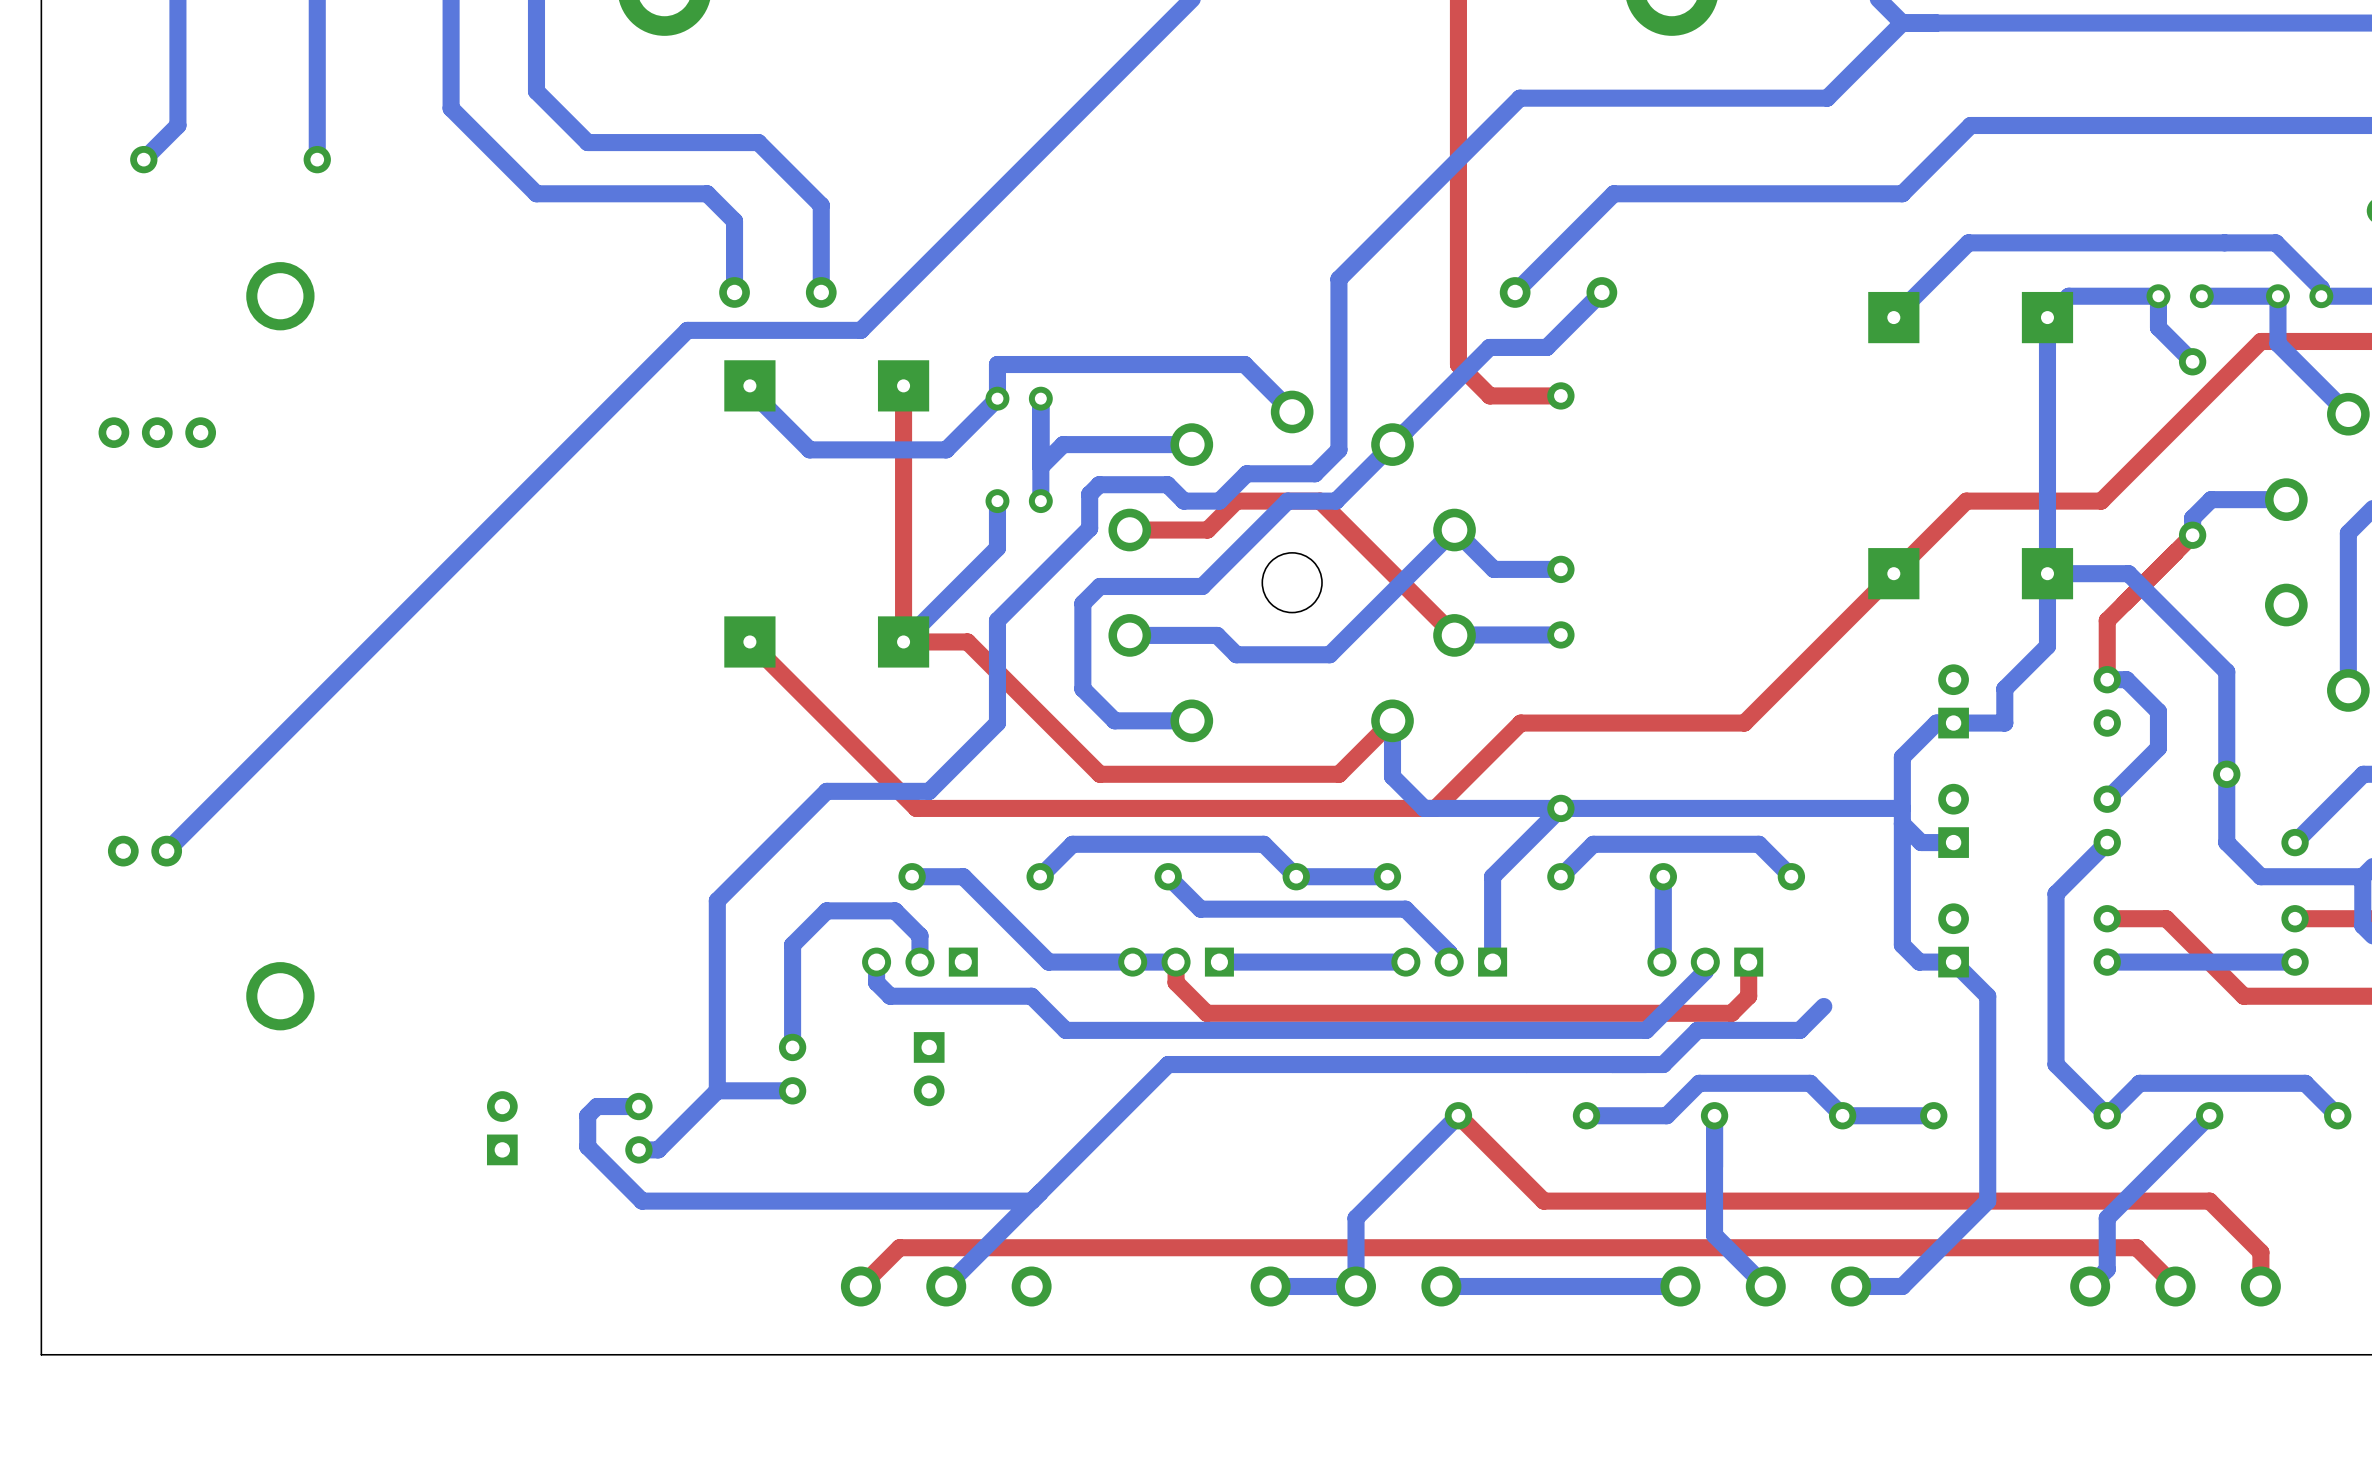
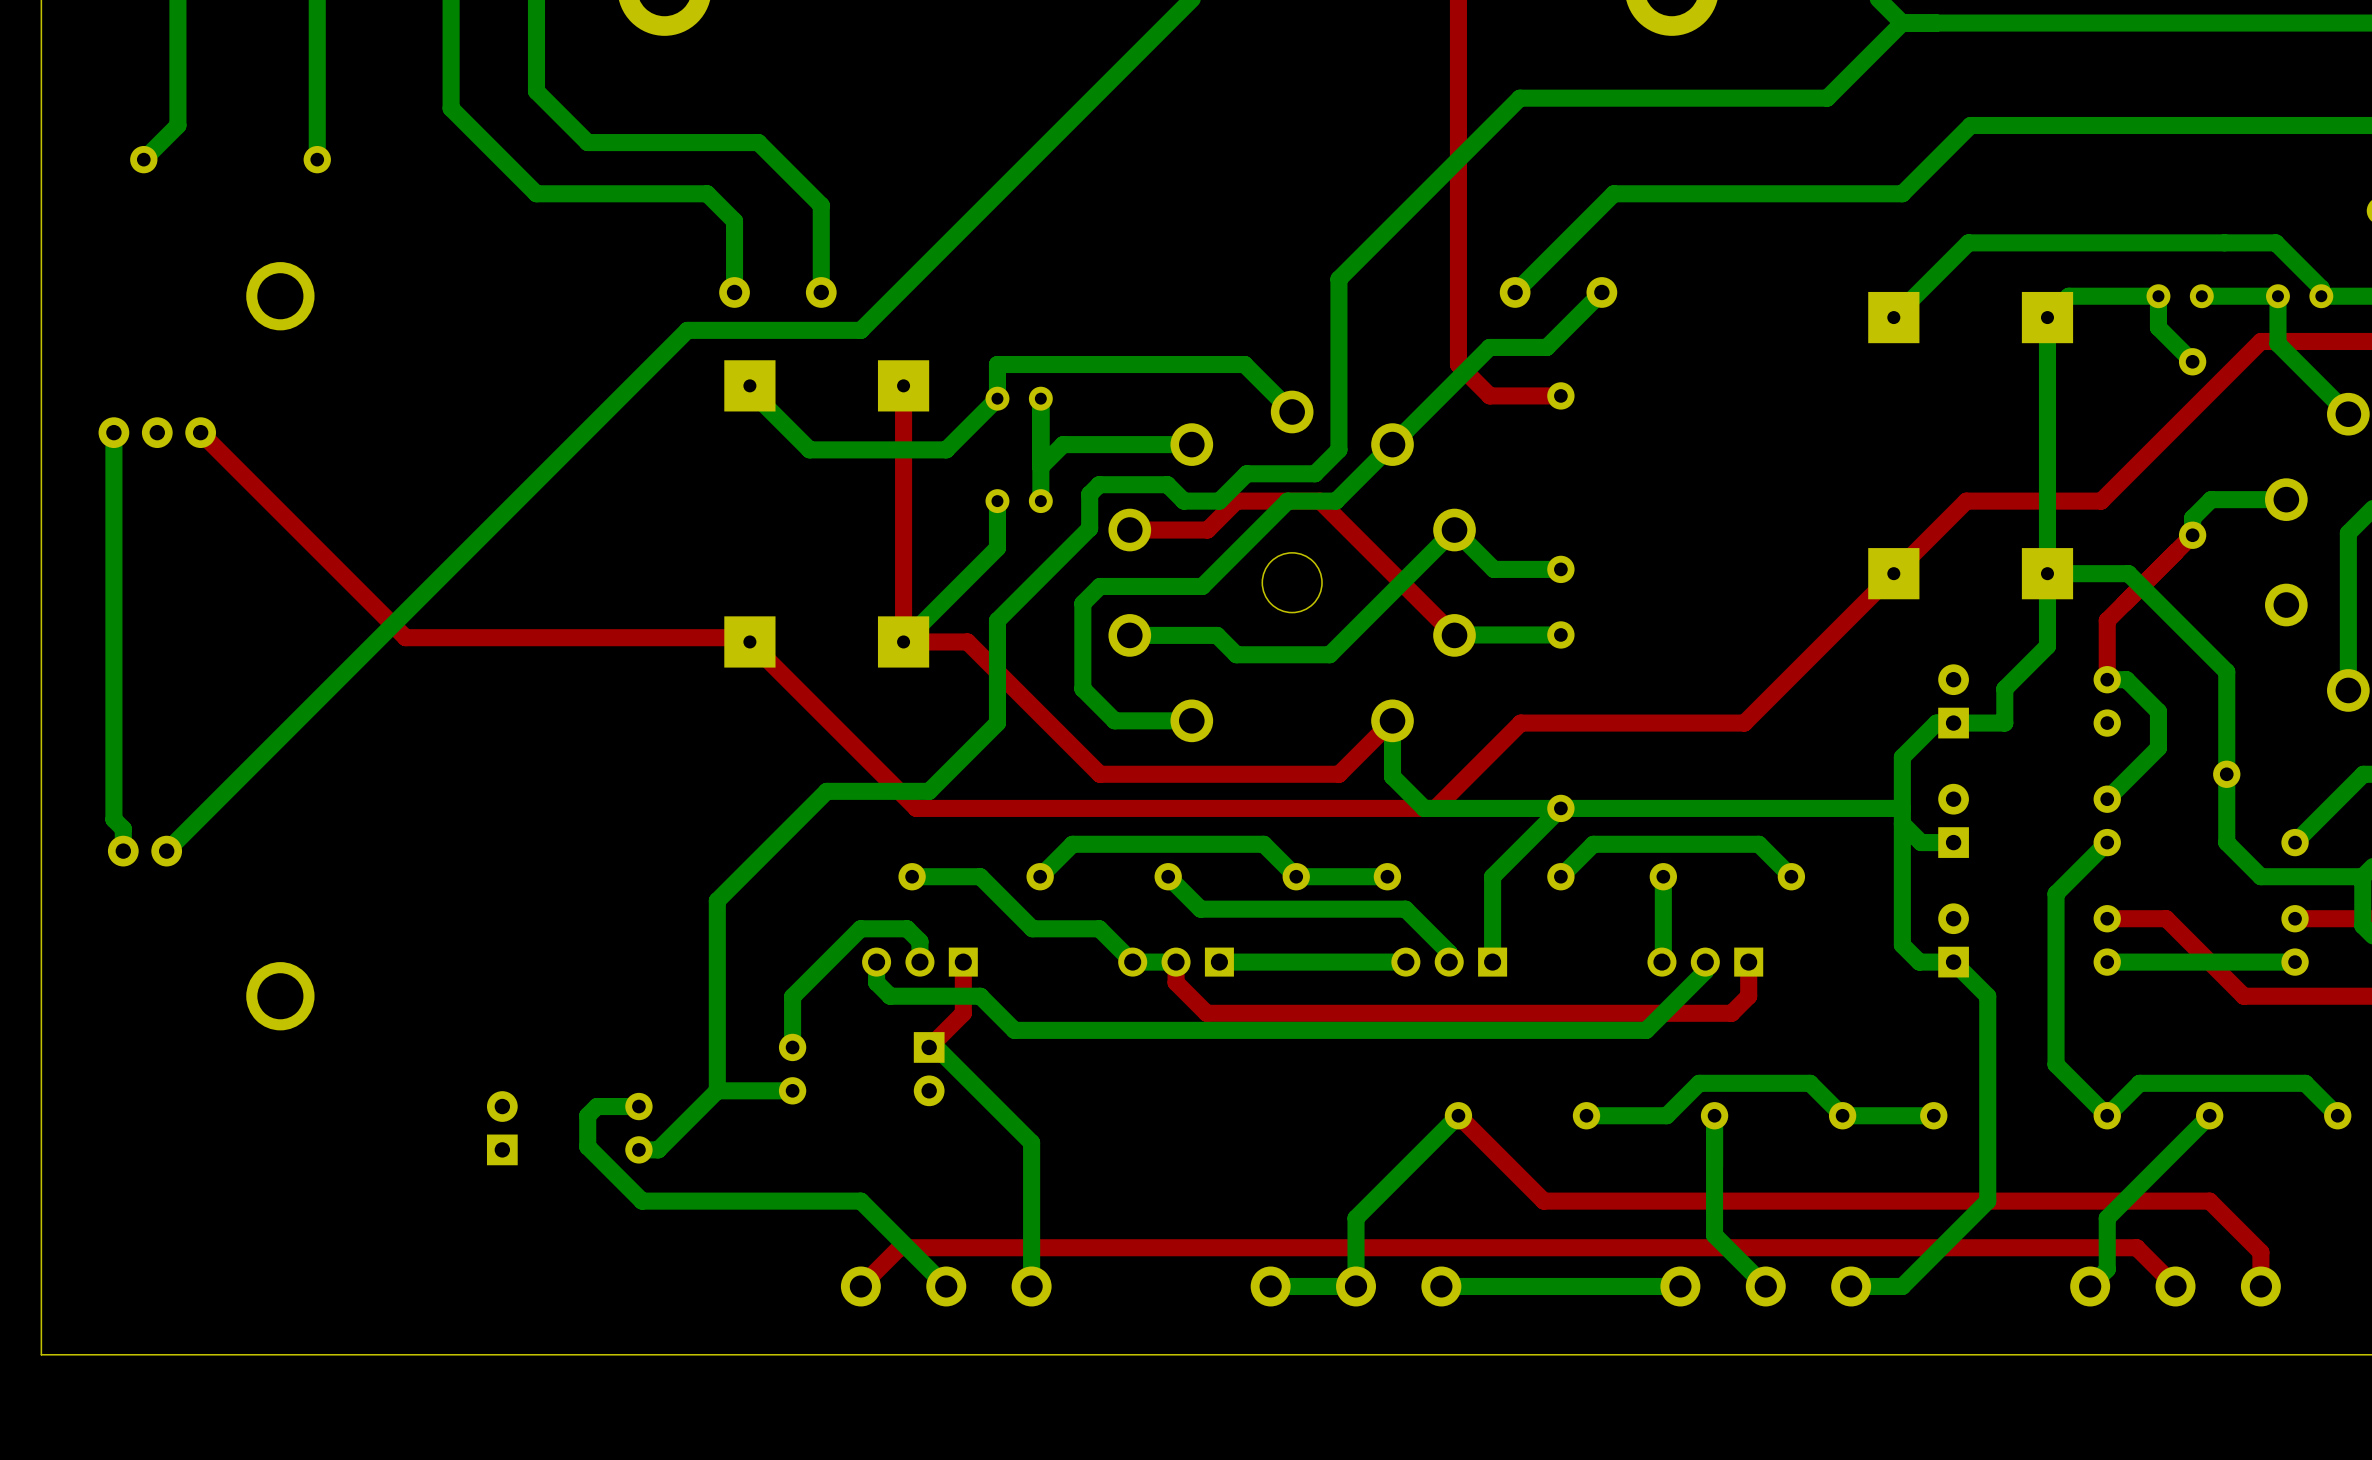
bottom track: none -> (113, 432) (113, 819) (123, 828) (123, 851)
top track: none -> (200, 432) (405, 637) (745, 637) (749, 641)
bottom track: (963, 876) (1048, 962) (1132, 962) -> (963, 876) (980, 876) (1032, 928) (1099, 928) (1132, 962)
bottom track: (919, 941) (919, 935) (895, 910) (826, 910) (792, 945) (792, 996) -> (919, 941) (907, 928) (860, 928) (792, 996)
top track: none -> (963, 962) (963, 1013) (929, 1047)
bottom track: (980, 996) (1031, 996) (1065, 1030) -> (980, 996) (1014, 1030) (1065, 1030)
bottom track: (1823, 1006) (1799, 1030) (1697, 1030) (1663, 1064) (1168, 1064) (946, 1286) -> none
bottom track: none -> (929, 1047) (936, 1047) (1031, 1142) (1031, 1286)
bottom track: (1031, 1201) (860, 1201) -> (946, 1286) (860, 1201)

